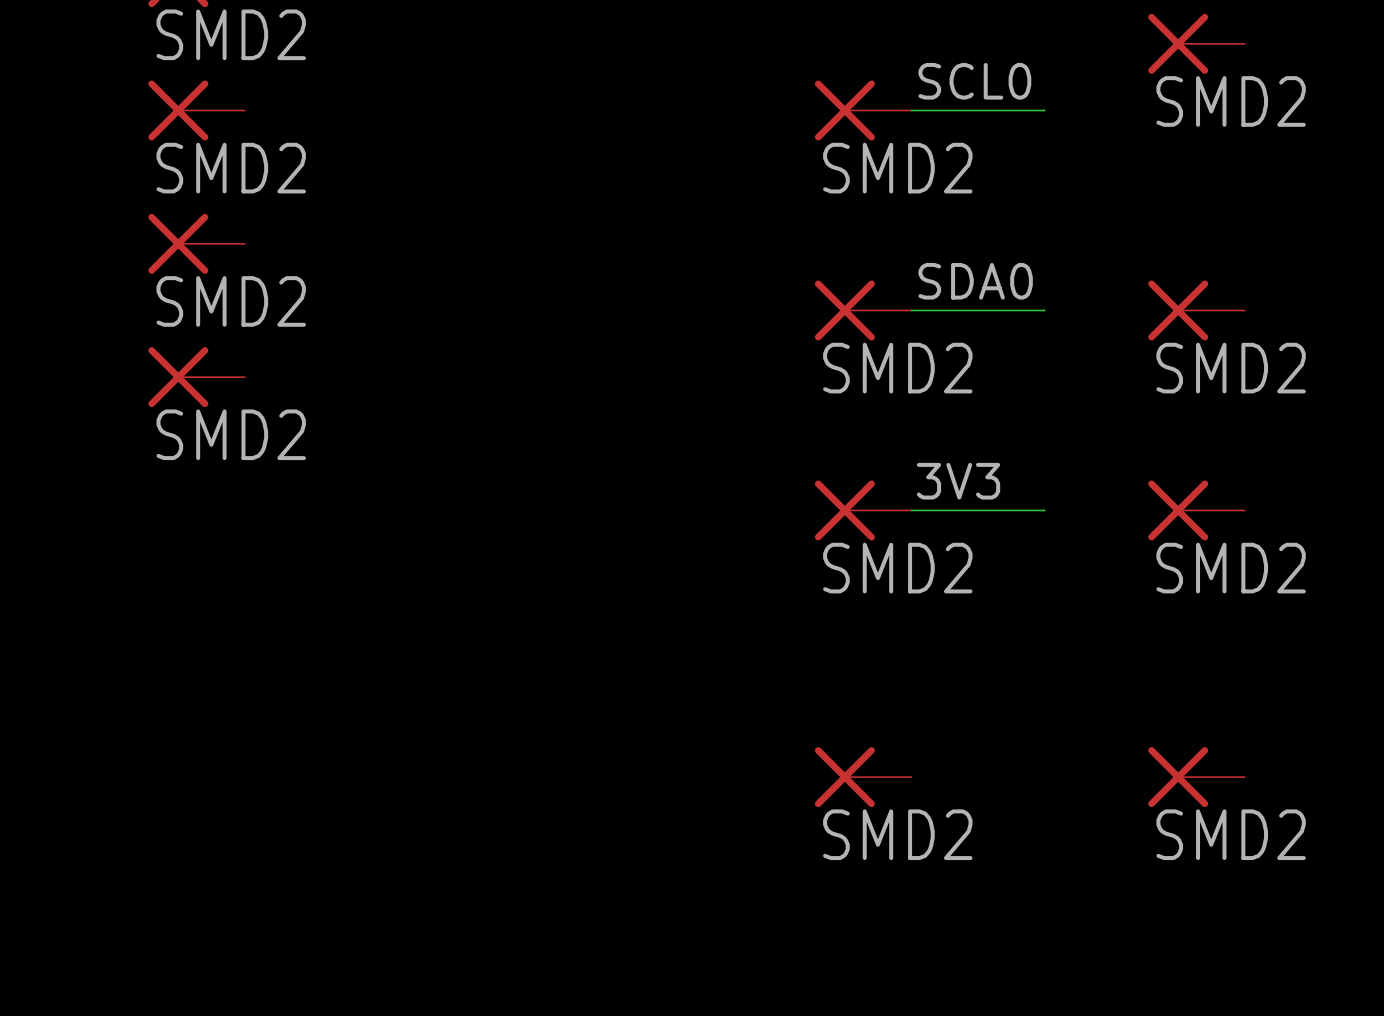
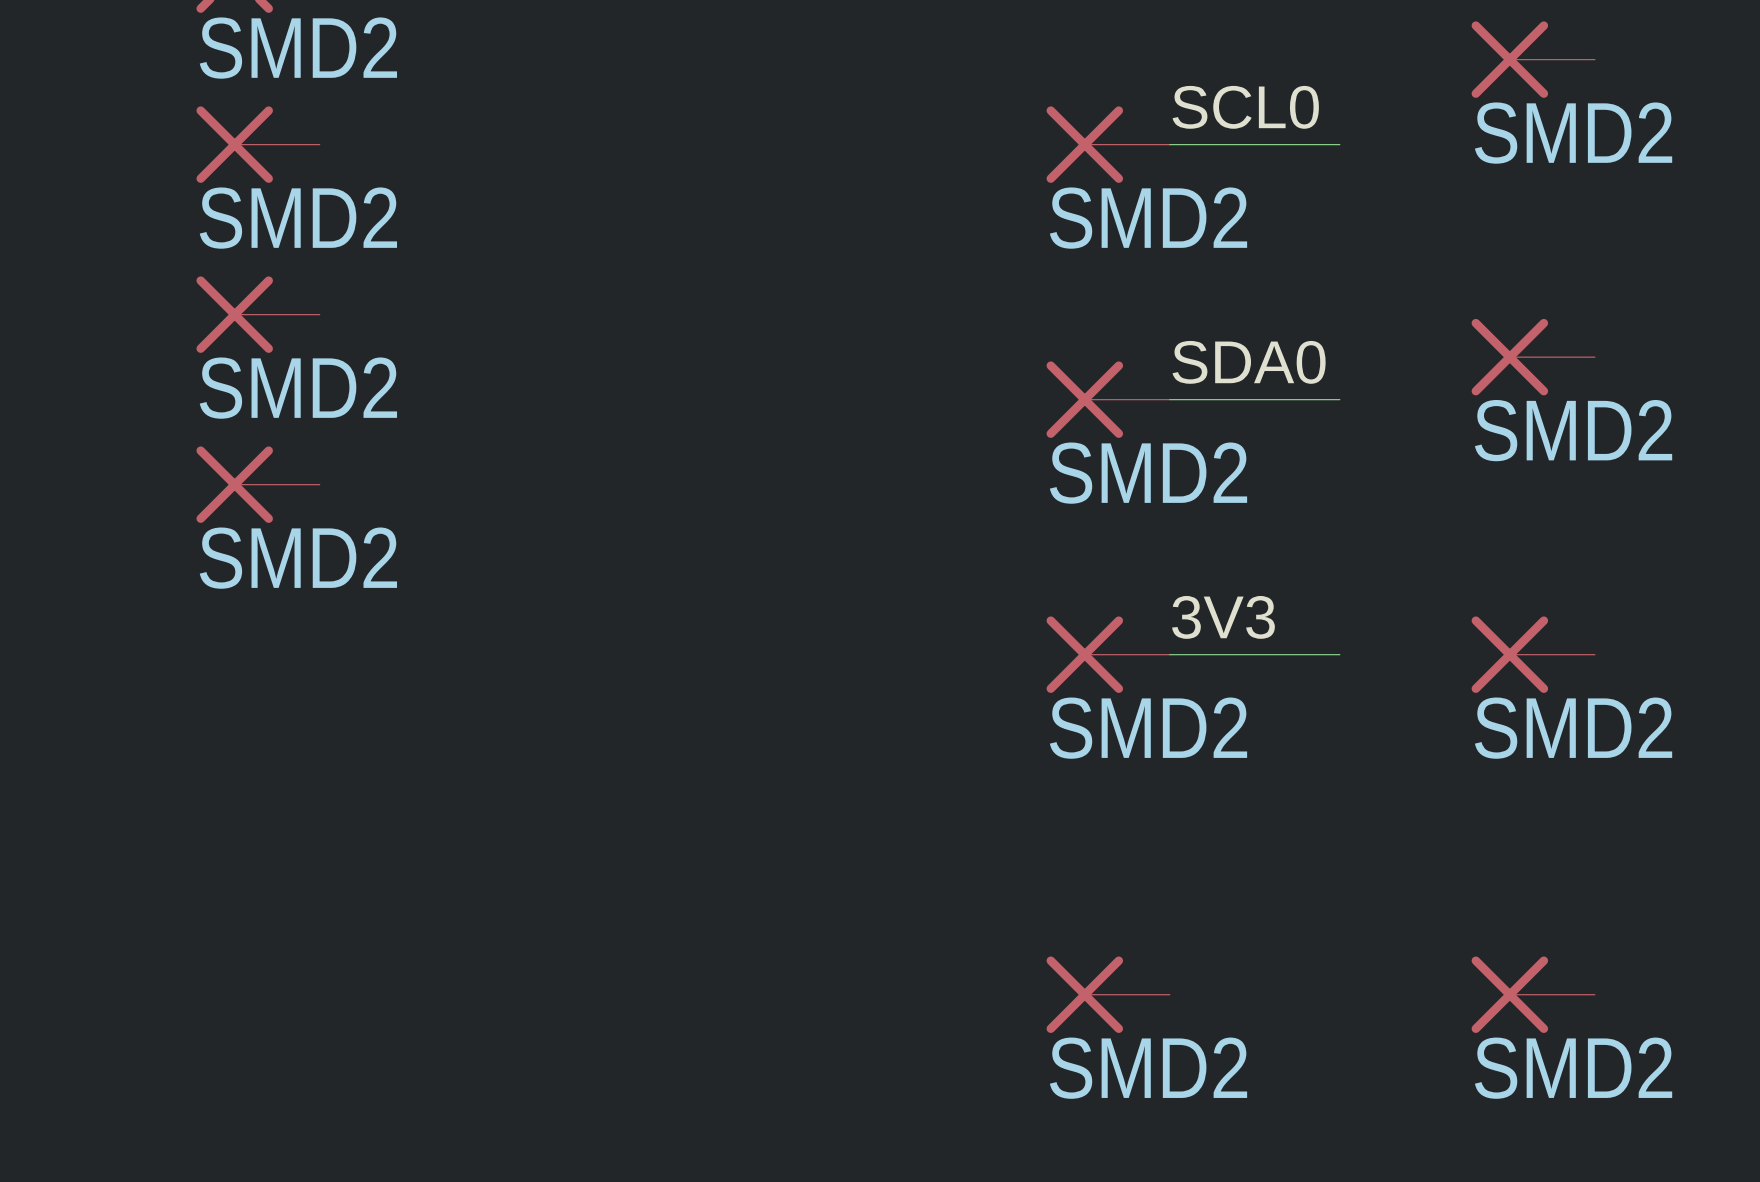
part position: (1196, 310) -> (1533, 357)

